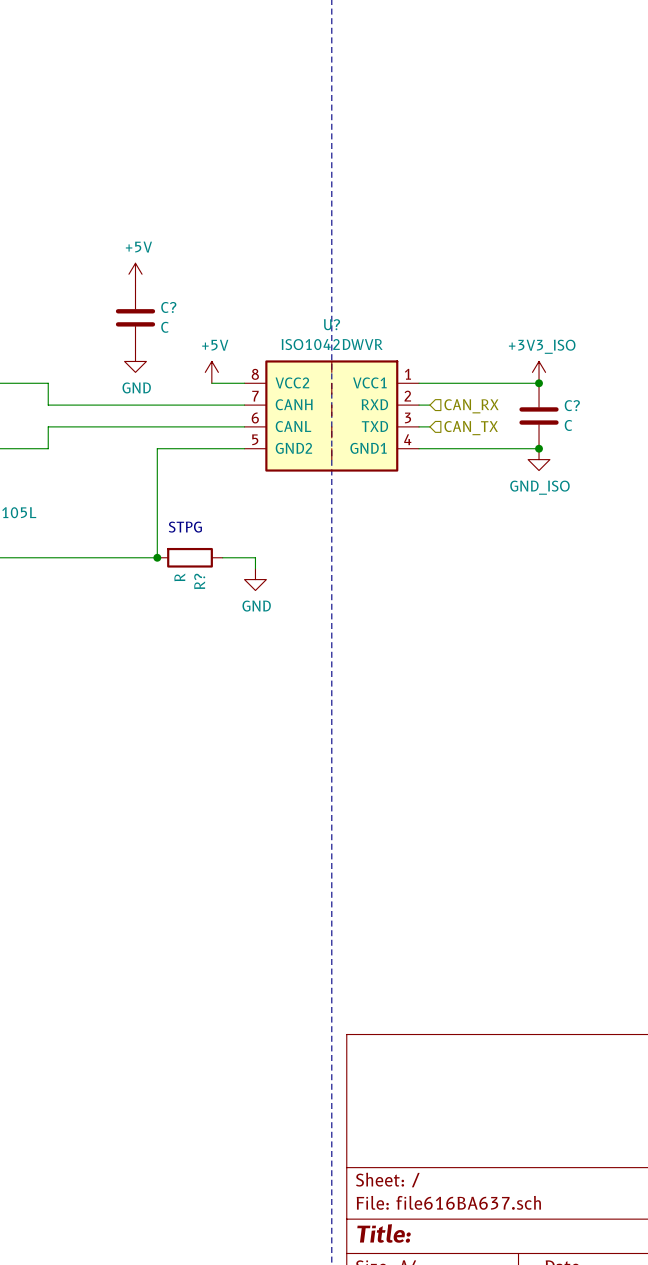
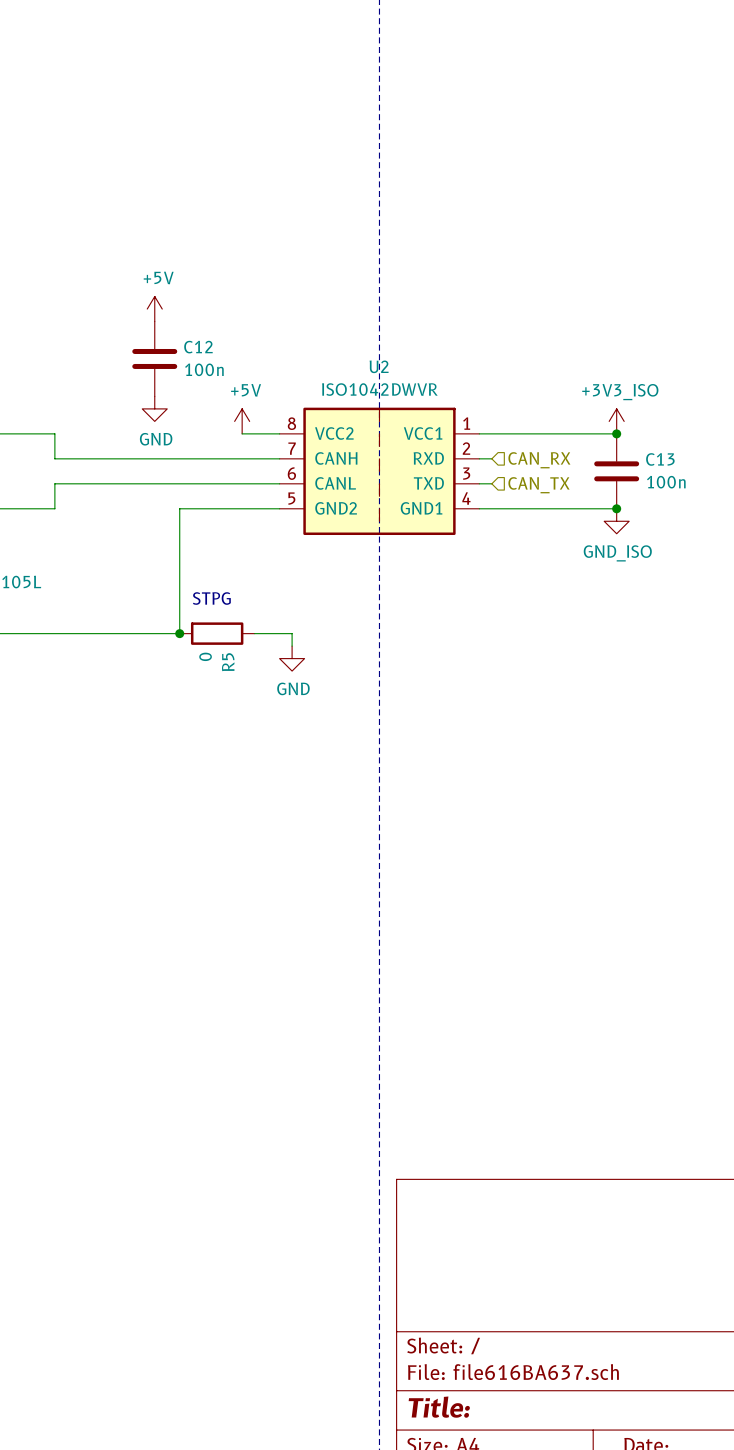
C? name: C? (168, 307) -> C12 (198, 347)
U? name: U? (331, 324) -> U2 (379, 366)
C? value: C (164, 327) -> 100n (204, 369)
C? name: C? (572, 405) -> C13 (660, 459)
C? value: C (568, 425) -> 100n (666, 482)
R? value: R (179, 577) -> 0 (205, 656)
R? name: R? (199, 581) -> R5 (228, 662)

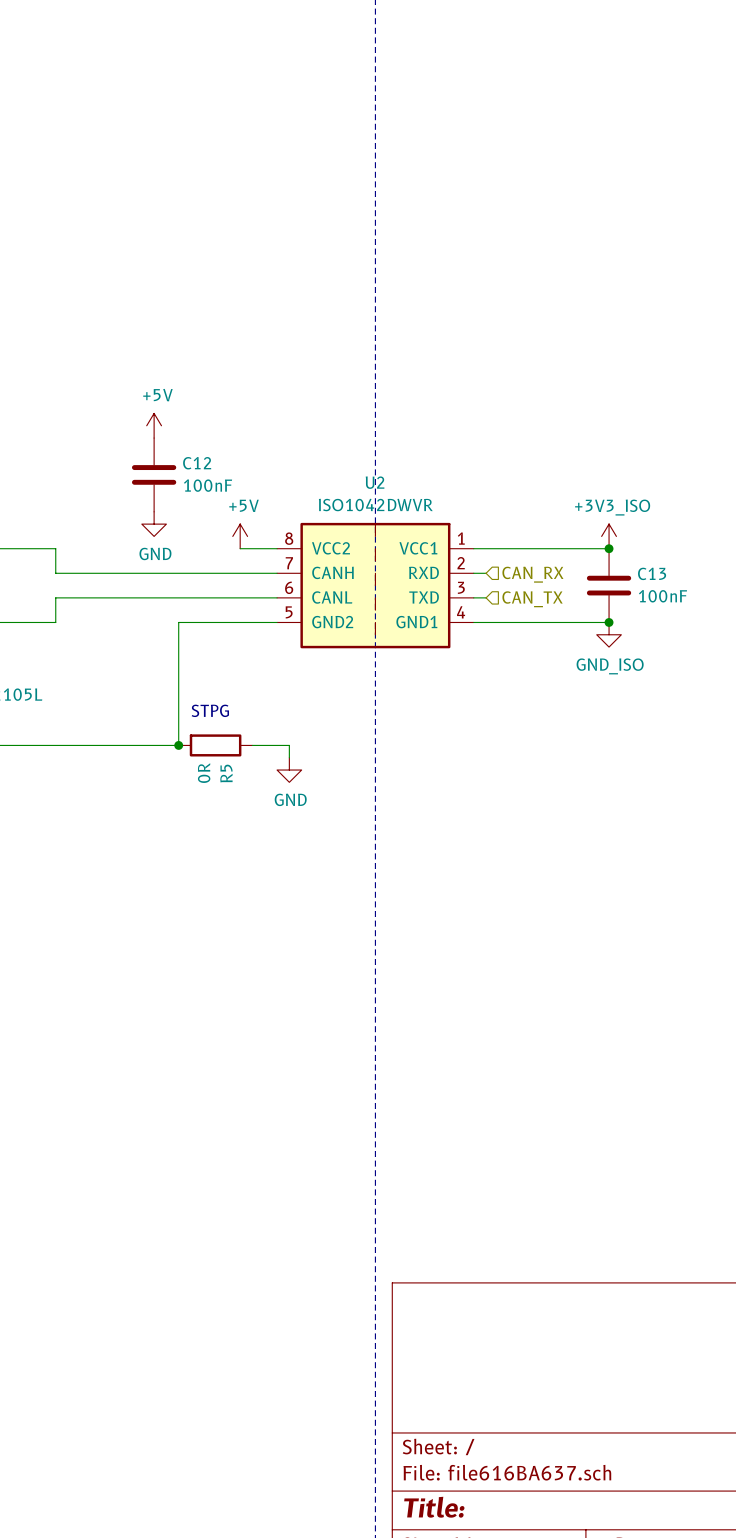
C12 value: 100n (204, 369) -> 100nF (208, 485)
C13 value: 100n (666, 482) -> 100nF (662, 596)
R5 value: 0 (205, 656) -> 0R (204, 773)

